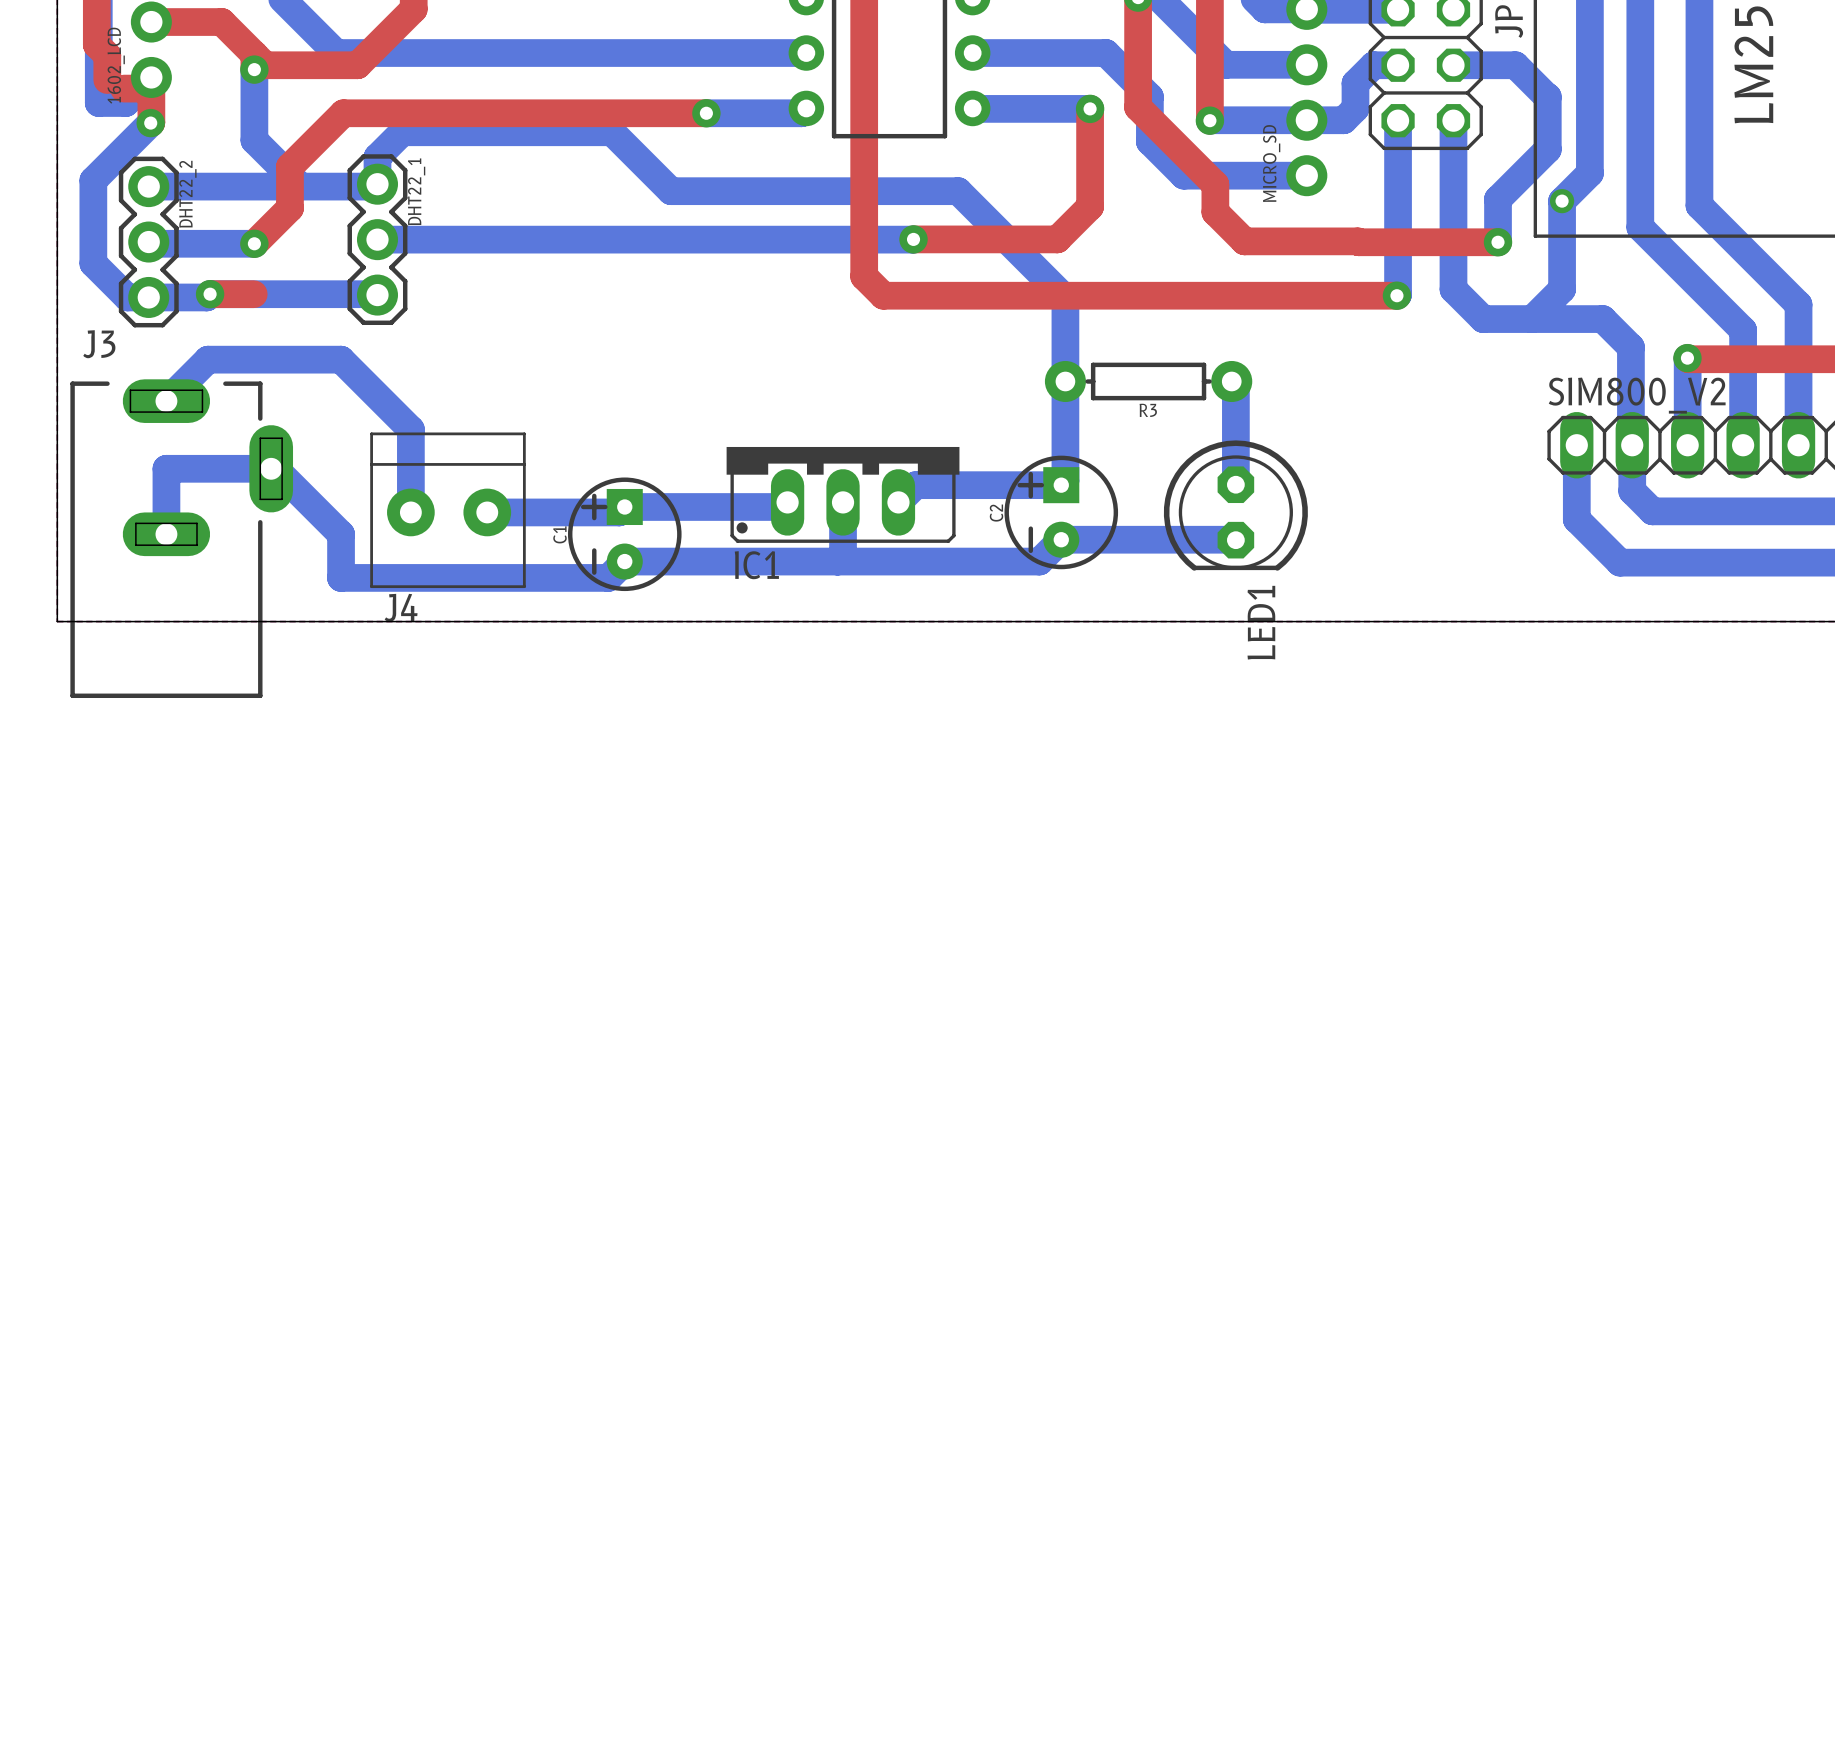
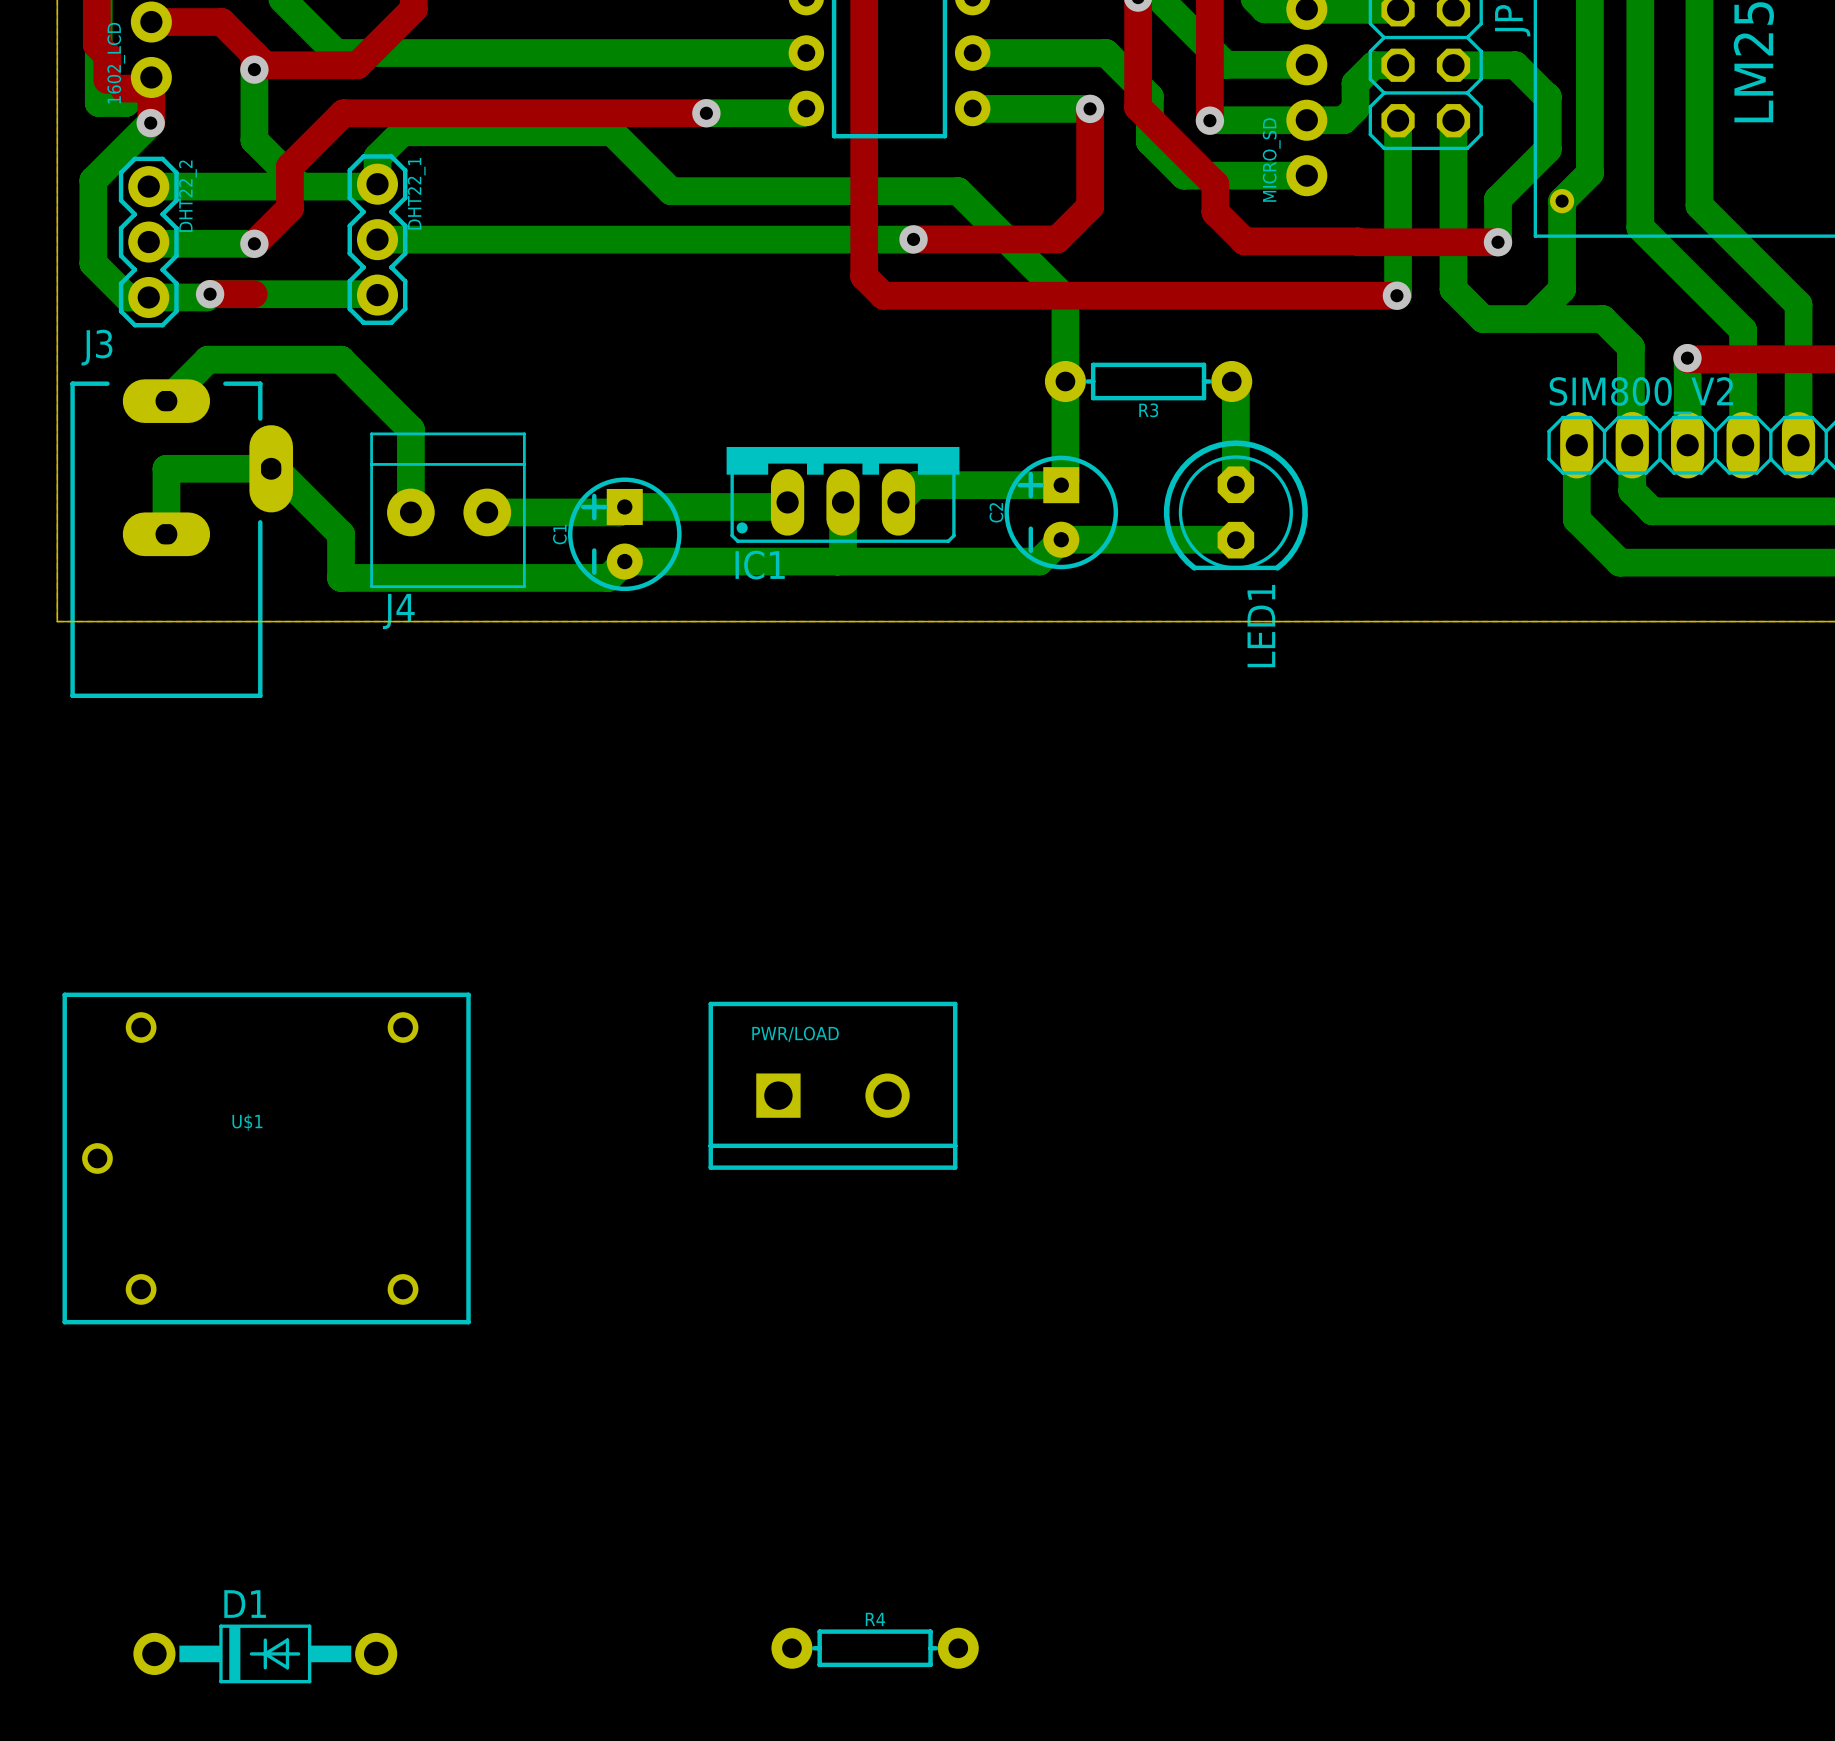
PWR/LOAD: none -> (832, 1085)
U$1: none -> (266, 1158)
R4: none -> (875, 1648)
D1: none -> (265, 1653)

